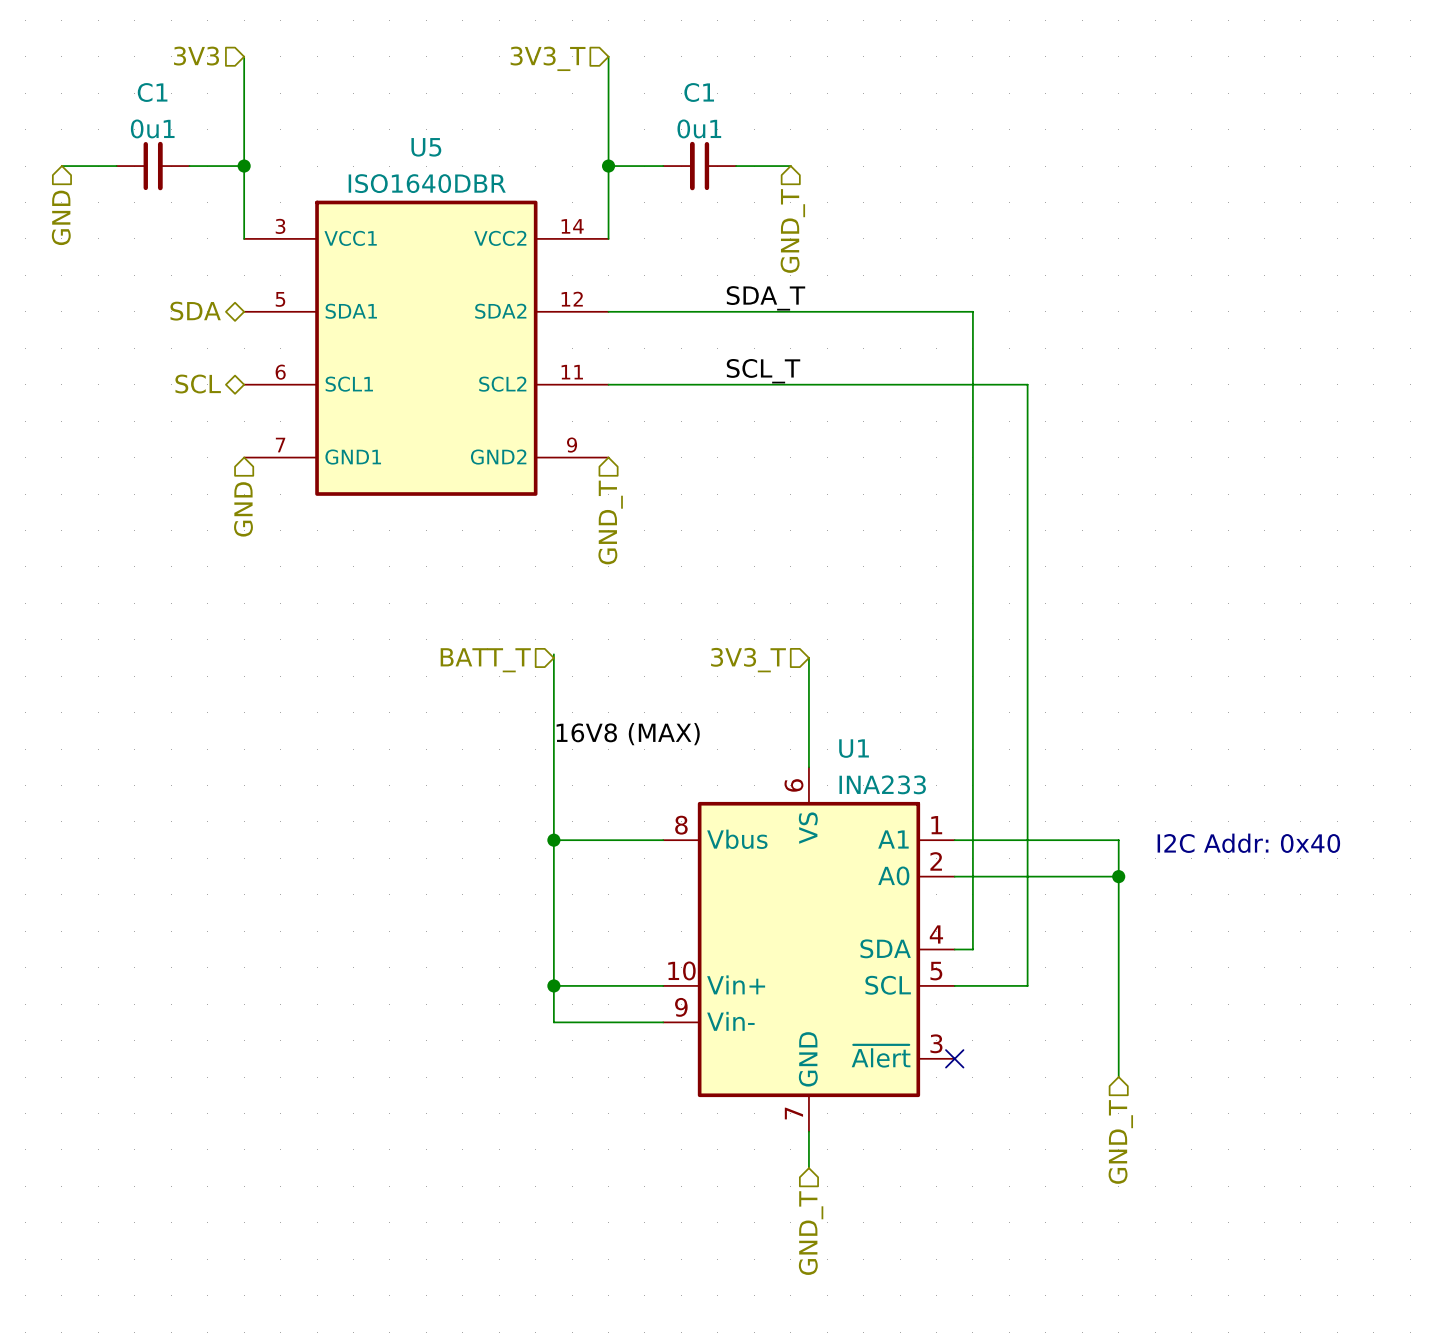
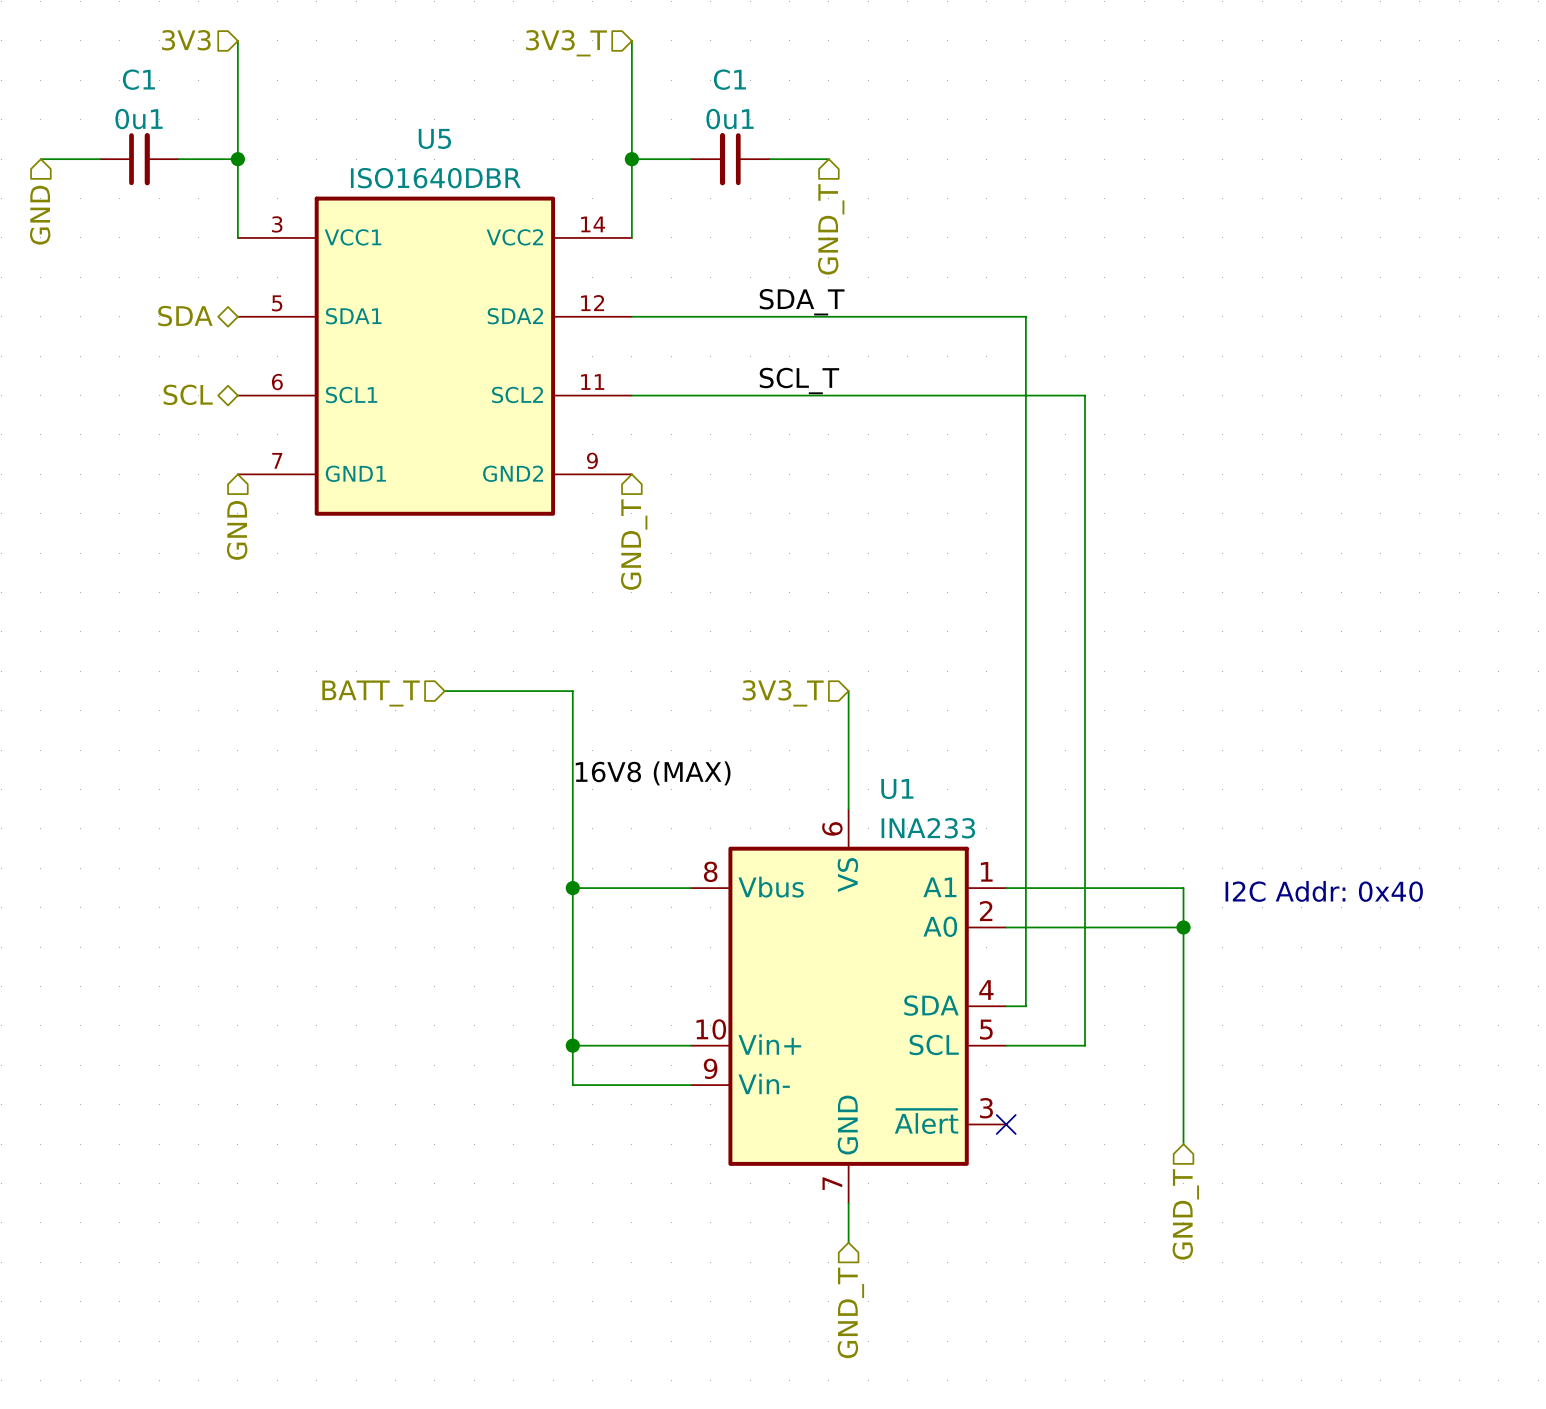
wire: (553, 654) (553, 657) -> (444, 691) (572, 691)
hierarchical label position: BATT_T (485, 660) -> BATT_T (371, 693)

